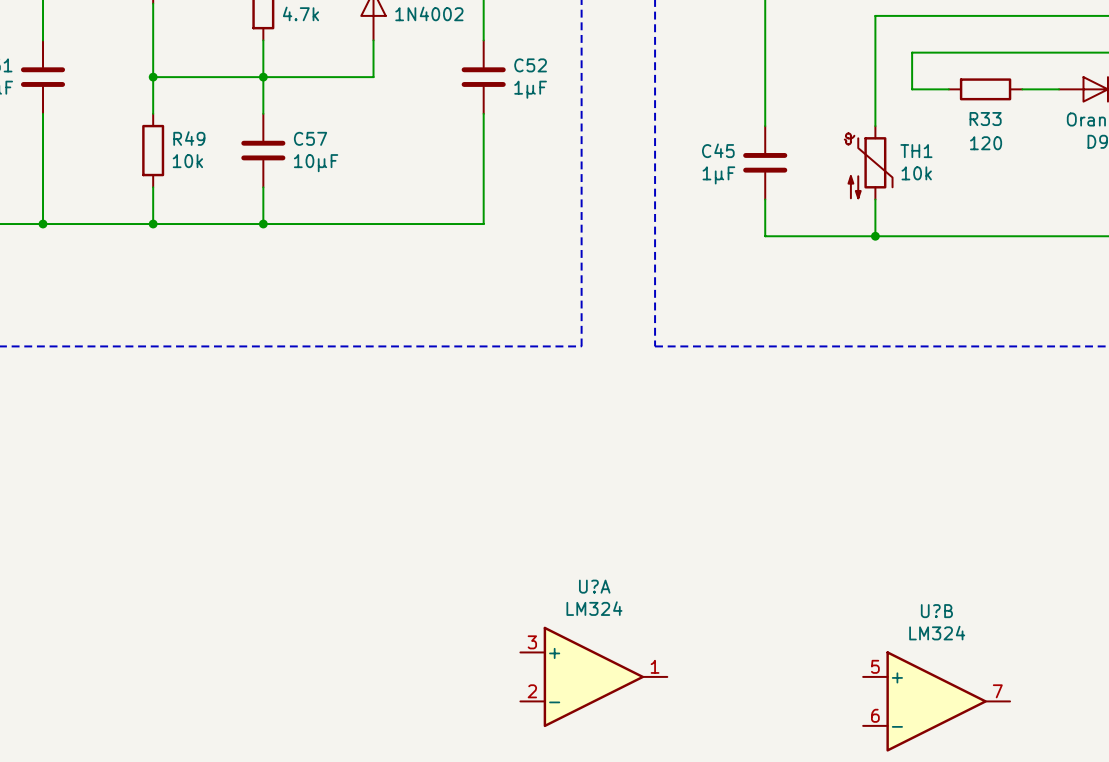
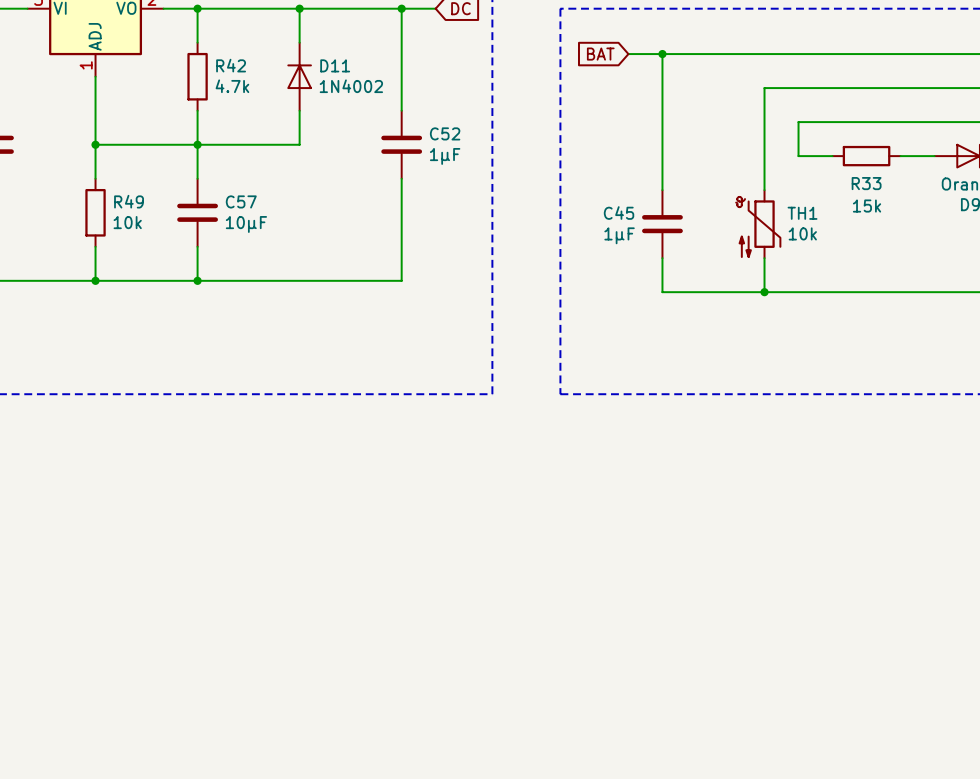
R33 value: 120 (986, 143) -> 15k (867, 206)
U?A: LM324 (593, 676) -> none
U?B: LM324 (936, 701) -> none

